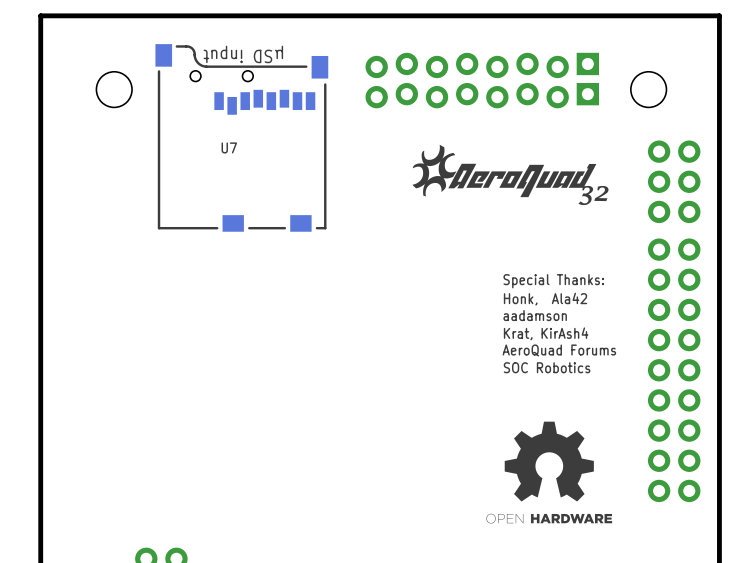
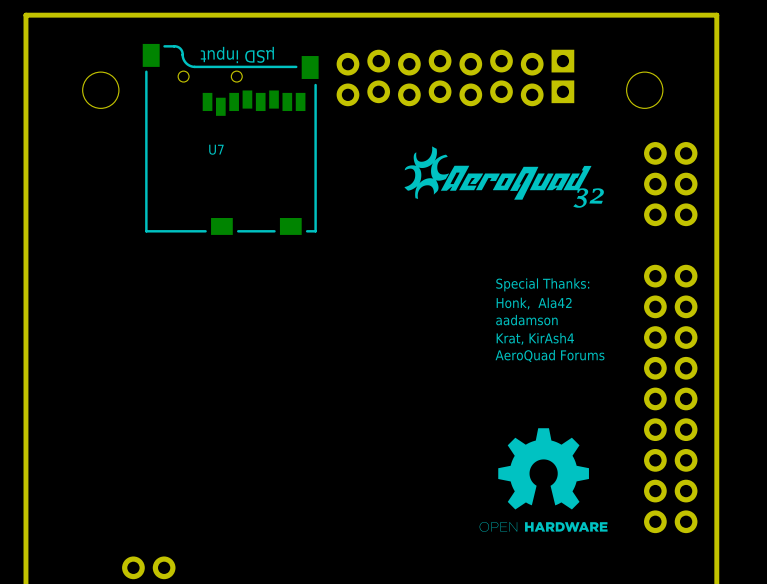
part: none -> (455, 62)
part: (482, 65) -> none
part: none -> (455, 93)
part: (482, 95) -> none
text: SOC Robotics (547, 367) -> none
part: (659, 370) -> none
part: (689, 370) -> none
part: none -> (655, 398)
part: none -> (686, 398)

